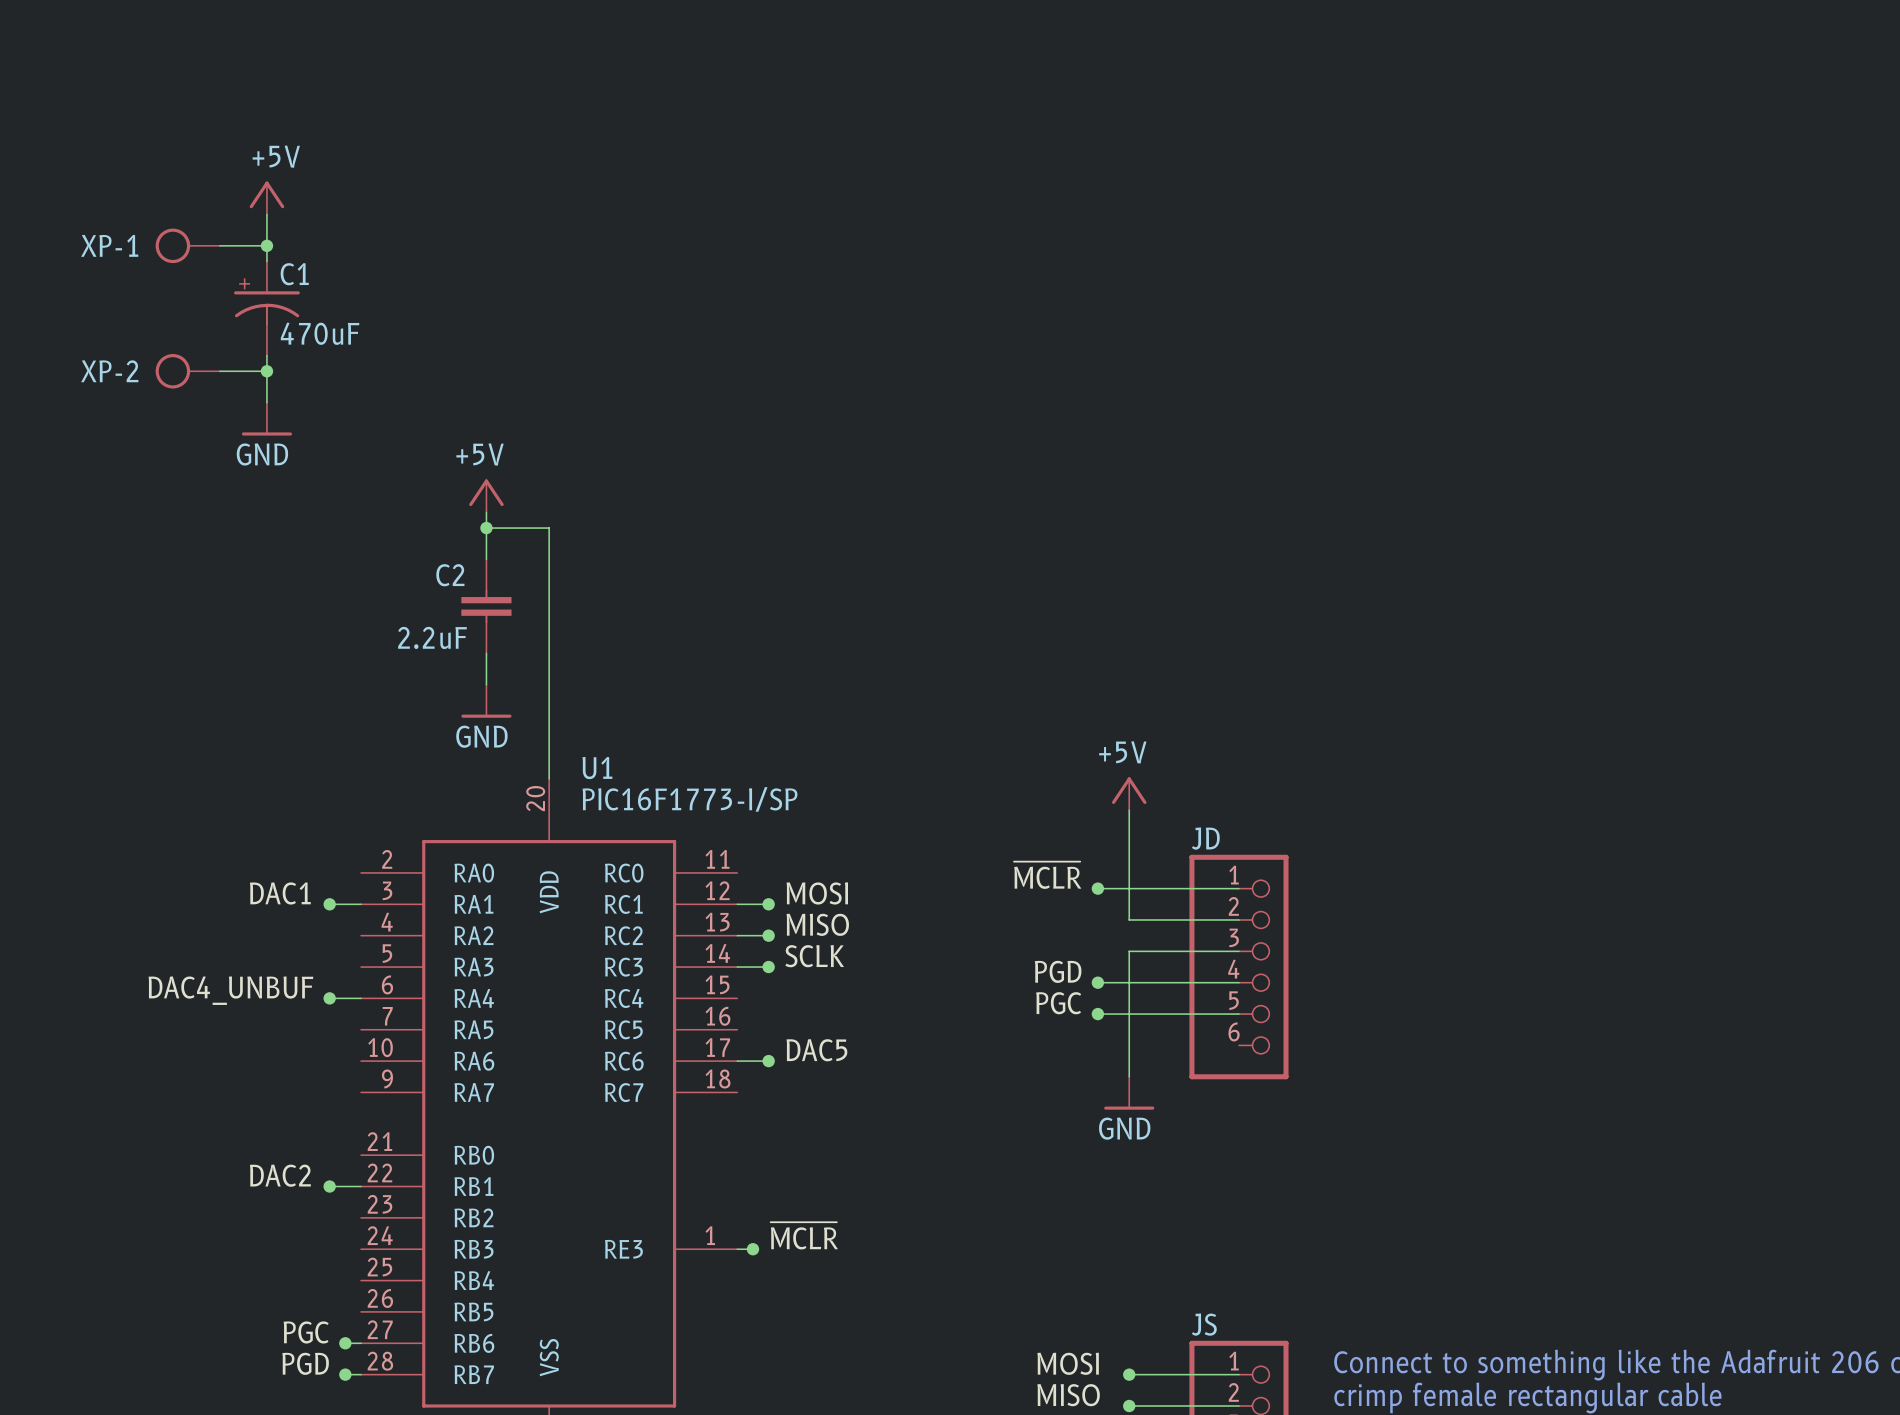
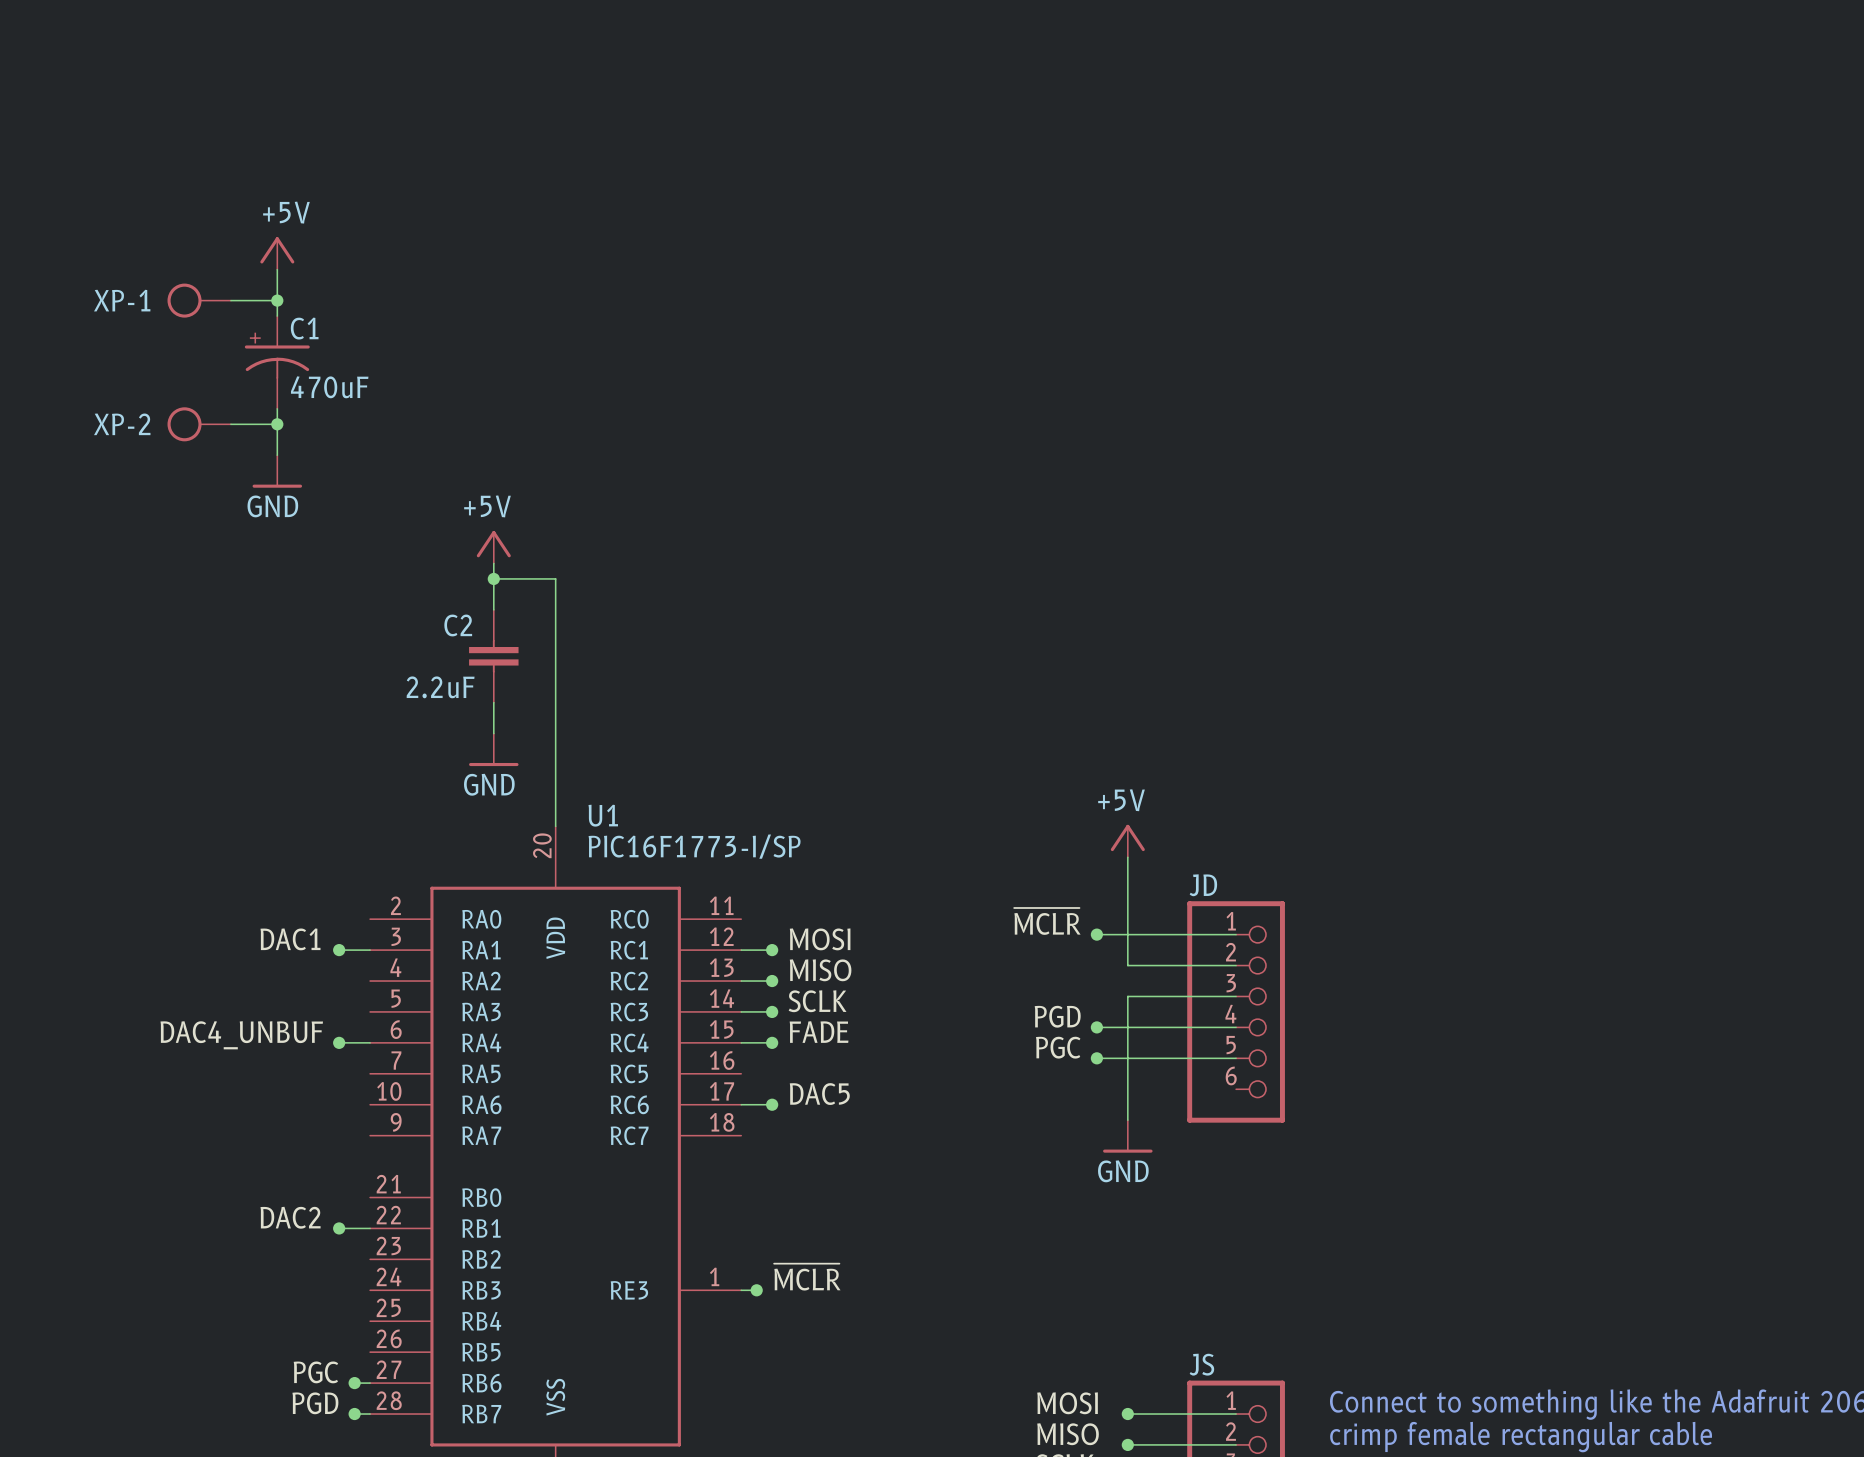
label: none -> FADE (819, 1032)
wire: none -> (741, 1042) (772, 1042)
junction: none -> (772, 1042)

